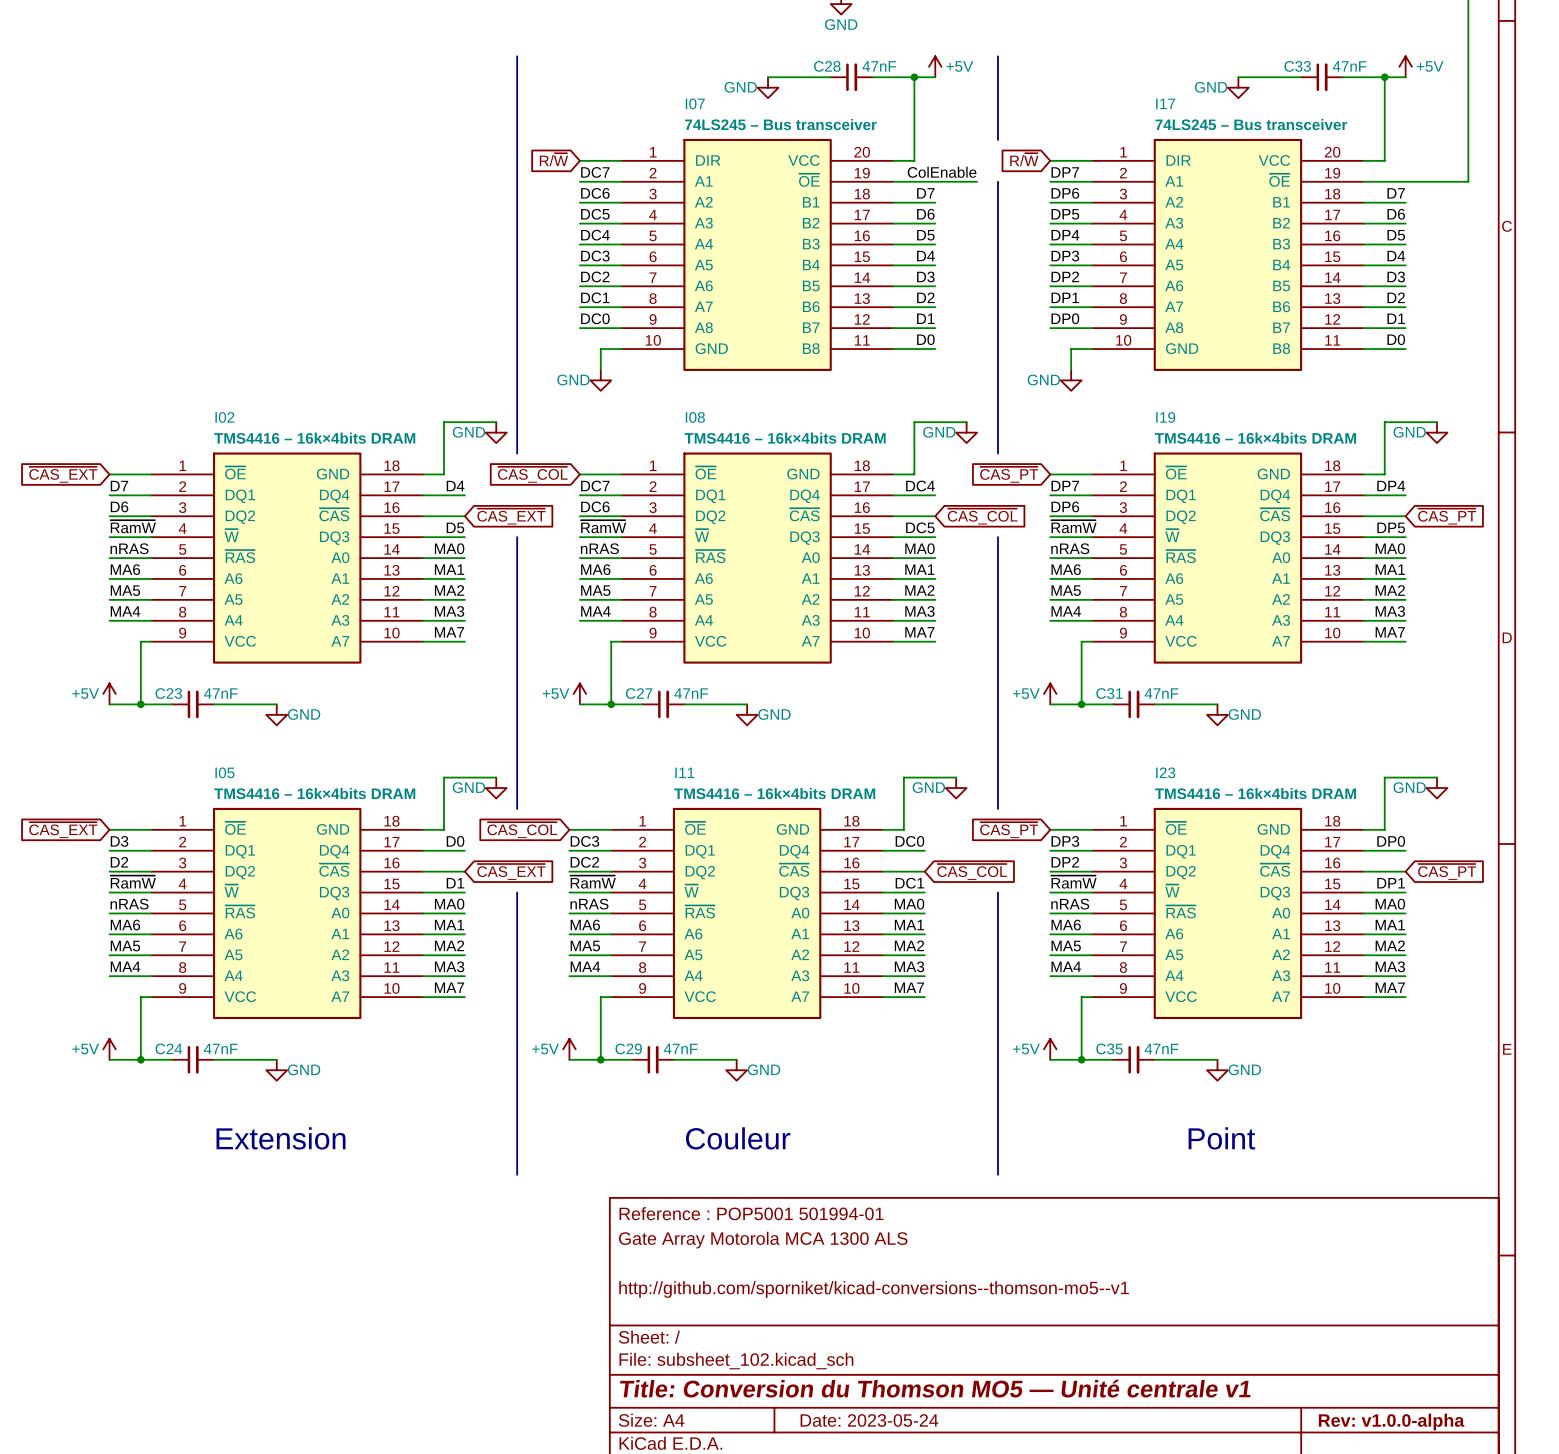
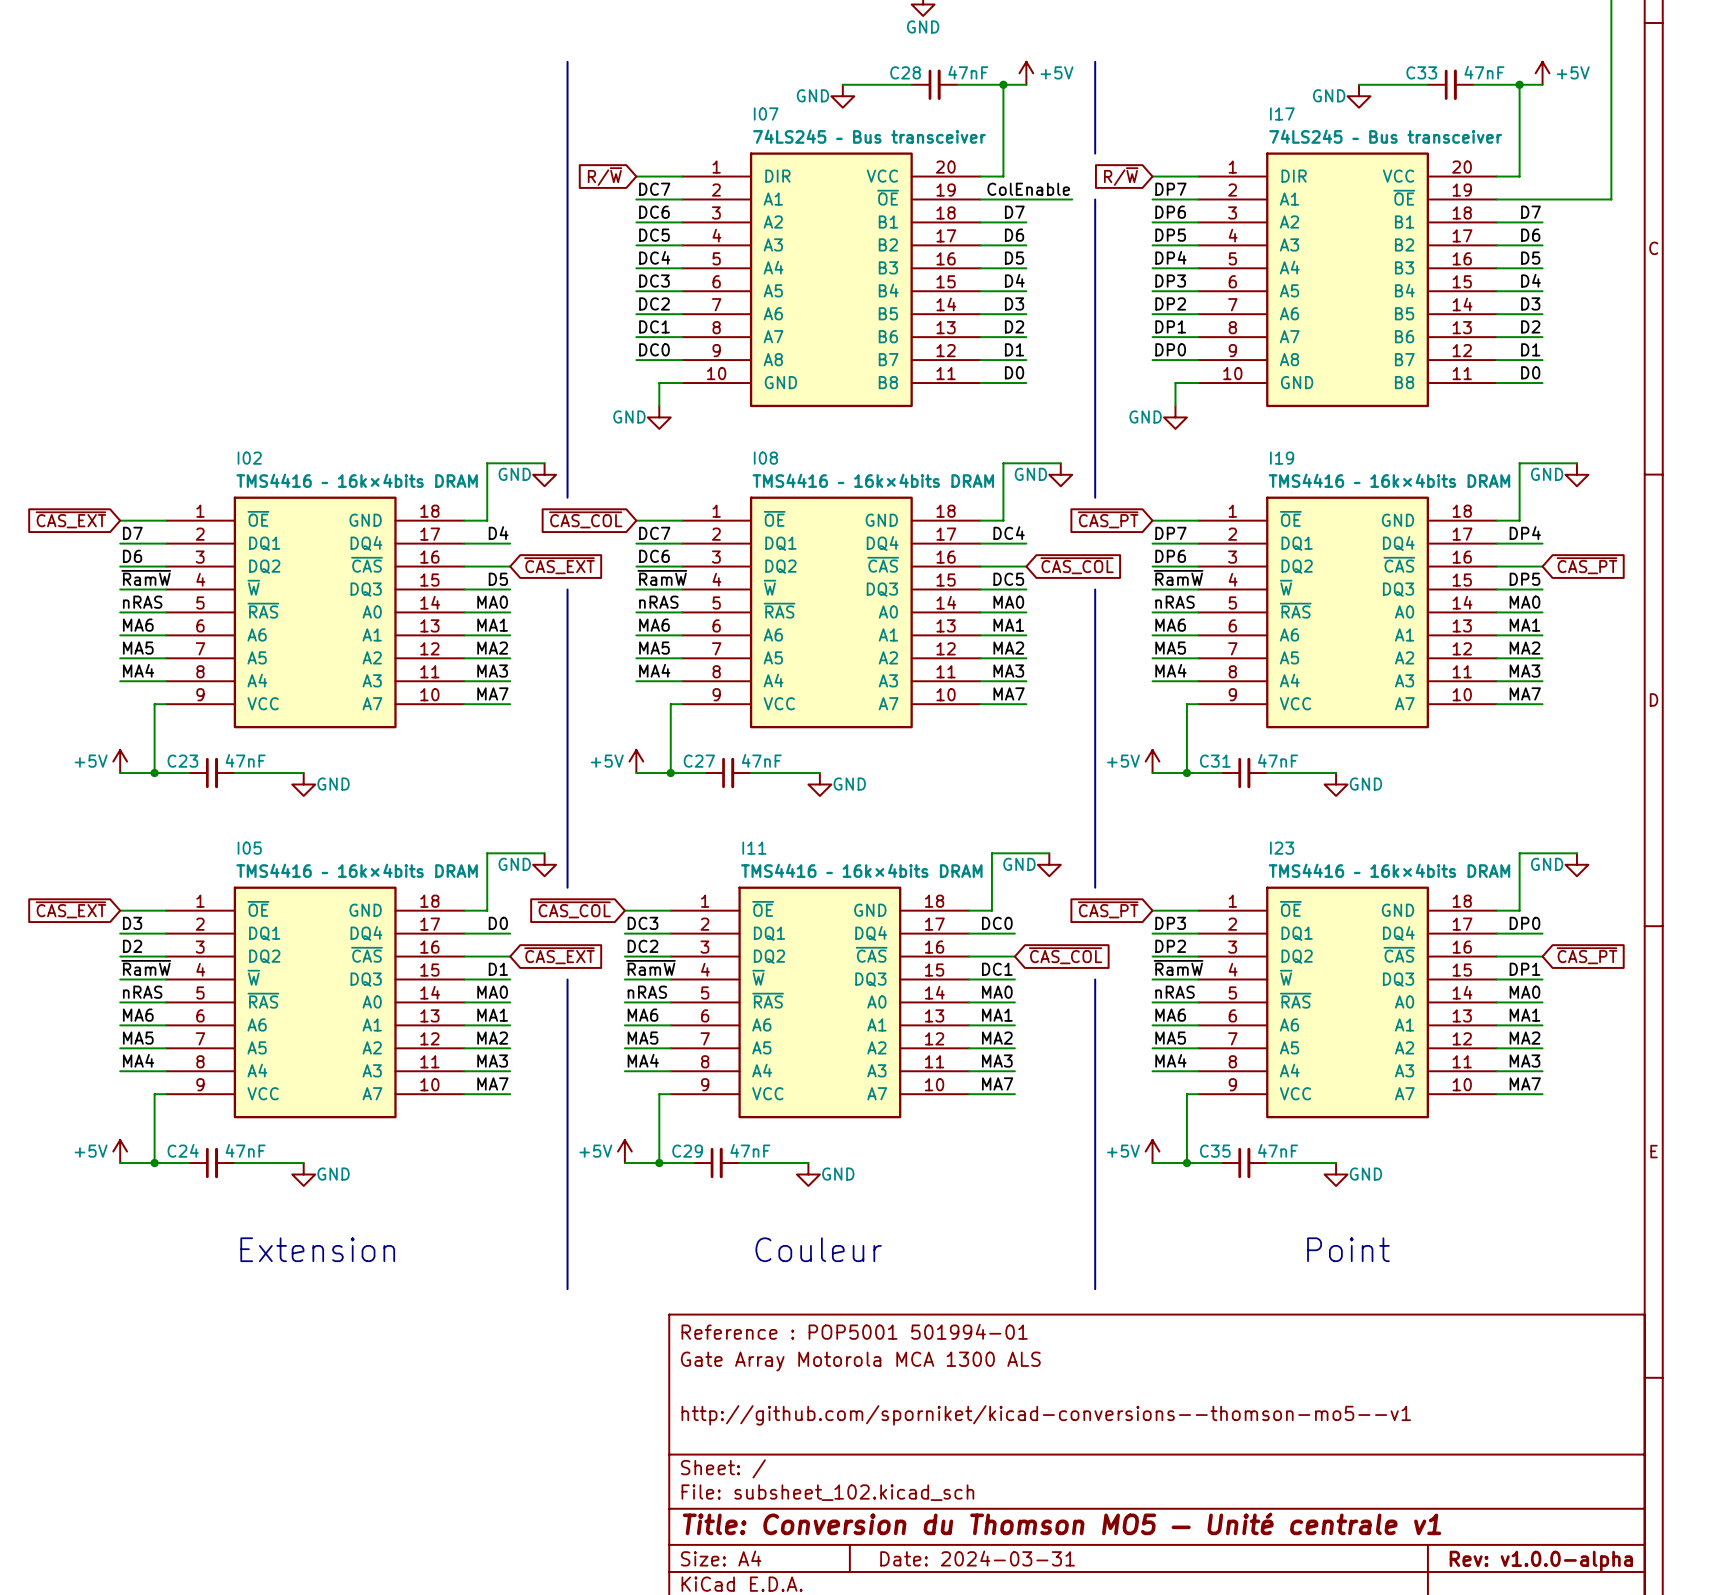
title block: Date: 2023-05-24 (869, 1420) -> Date: 2024-03-31 (977, 1558)

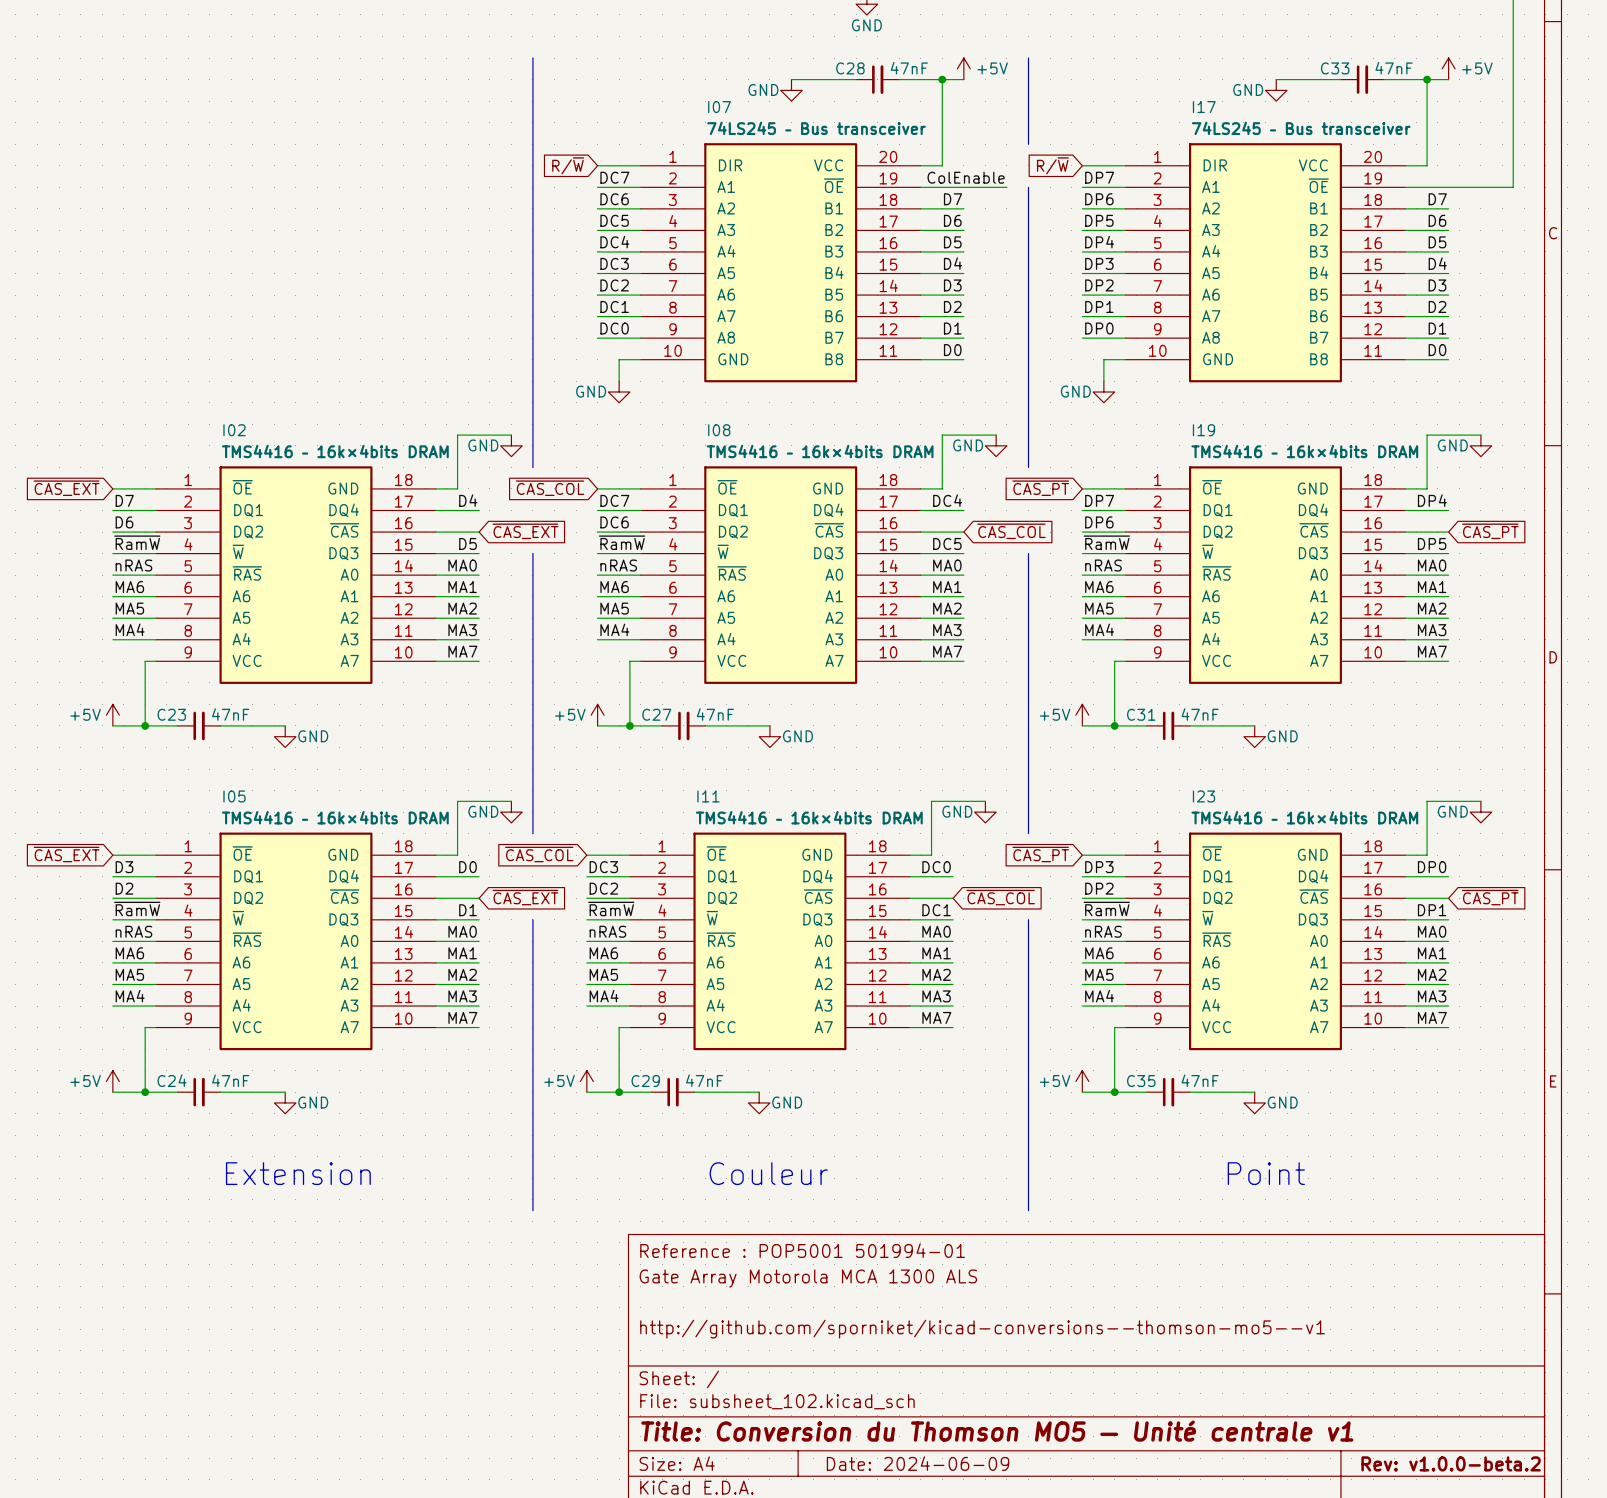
title block: Date: 2024-03-31 (977, 1558) -> Date: 2024-06-09 (918, 1463)
title block: Rev: v1.0.0-alpha (1541, 1561) -> Rev: v1.0.0-beta.2 (1451, 1463)

